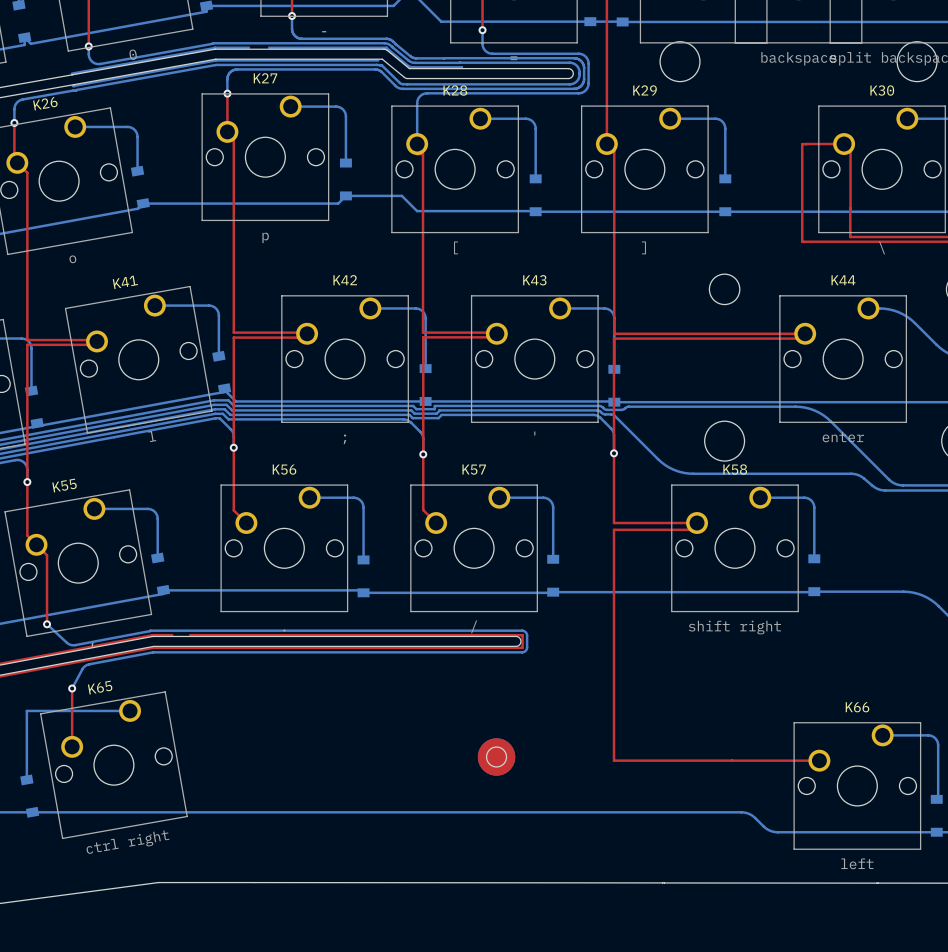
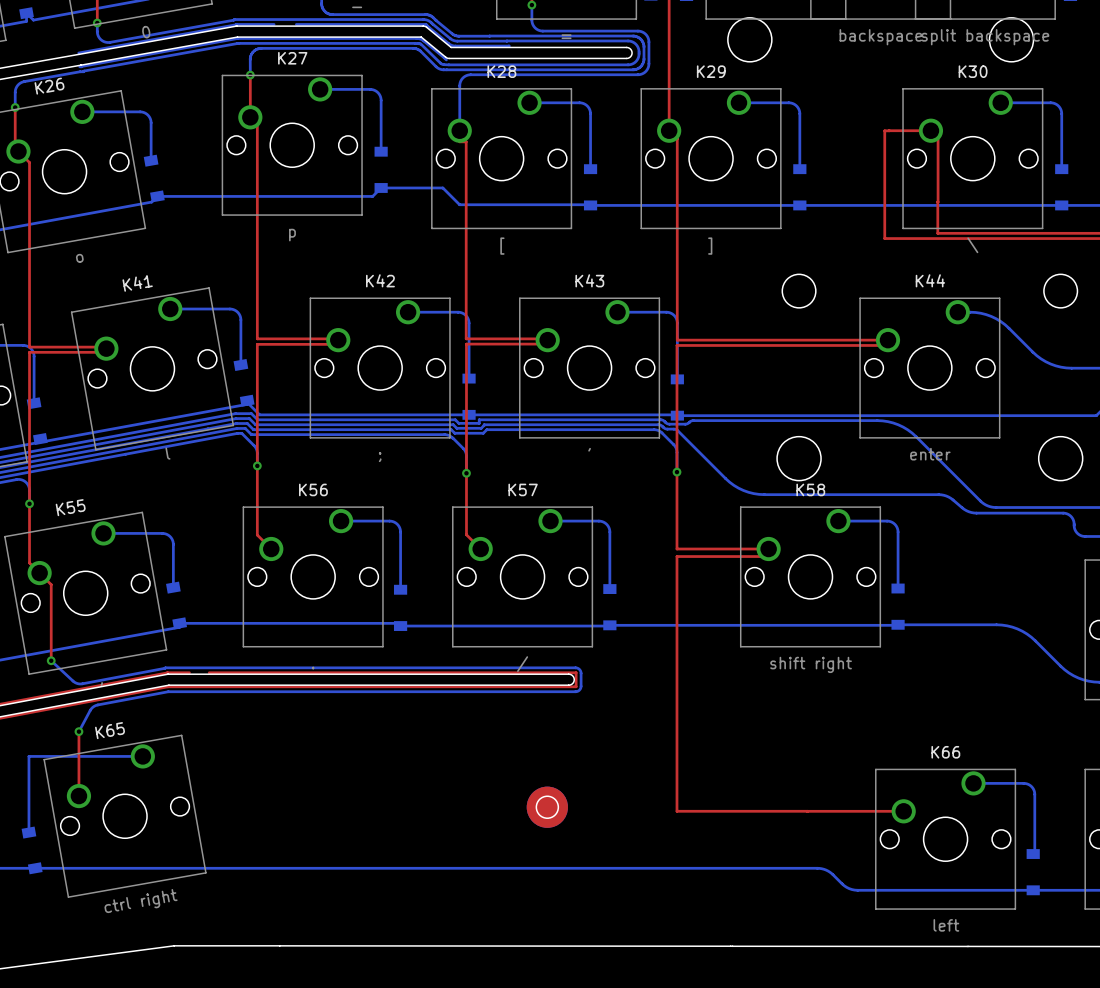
bottom track: none -> (416, 38) (422, 40) (446, 59)

